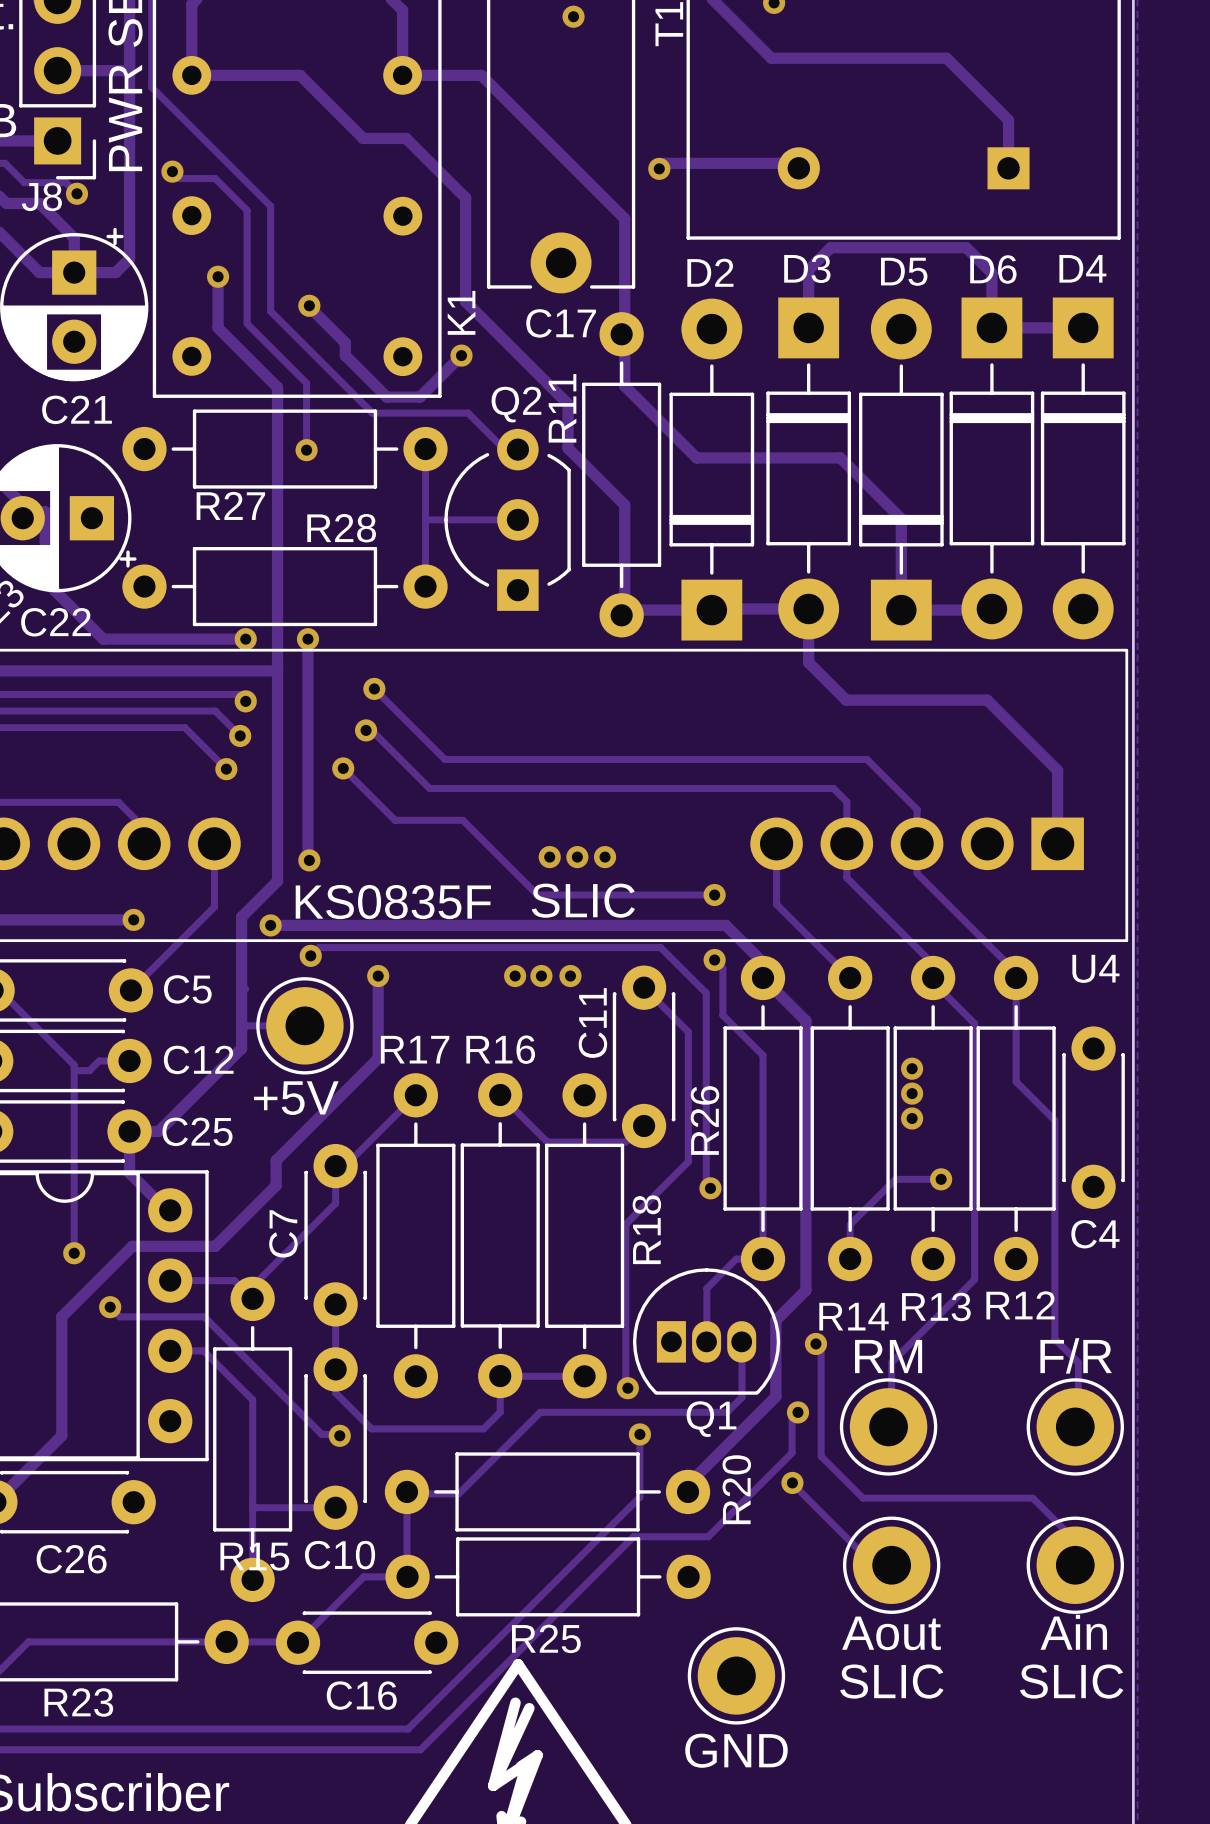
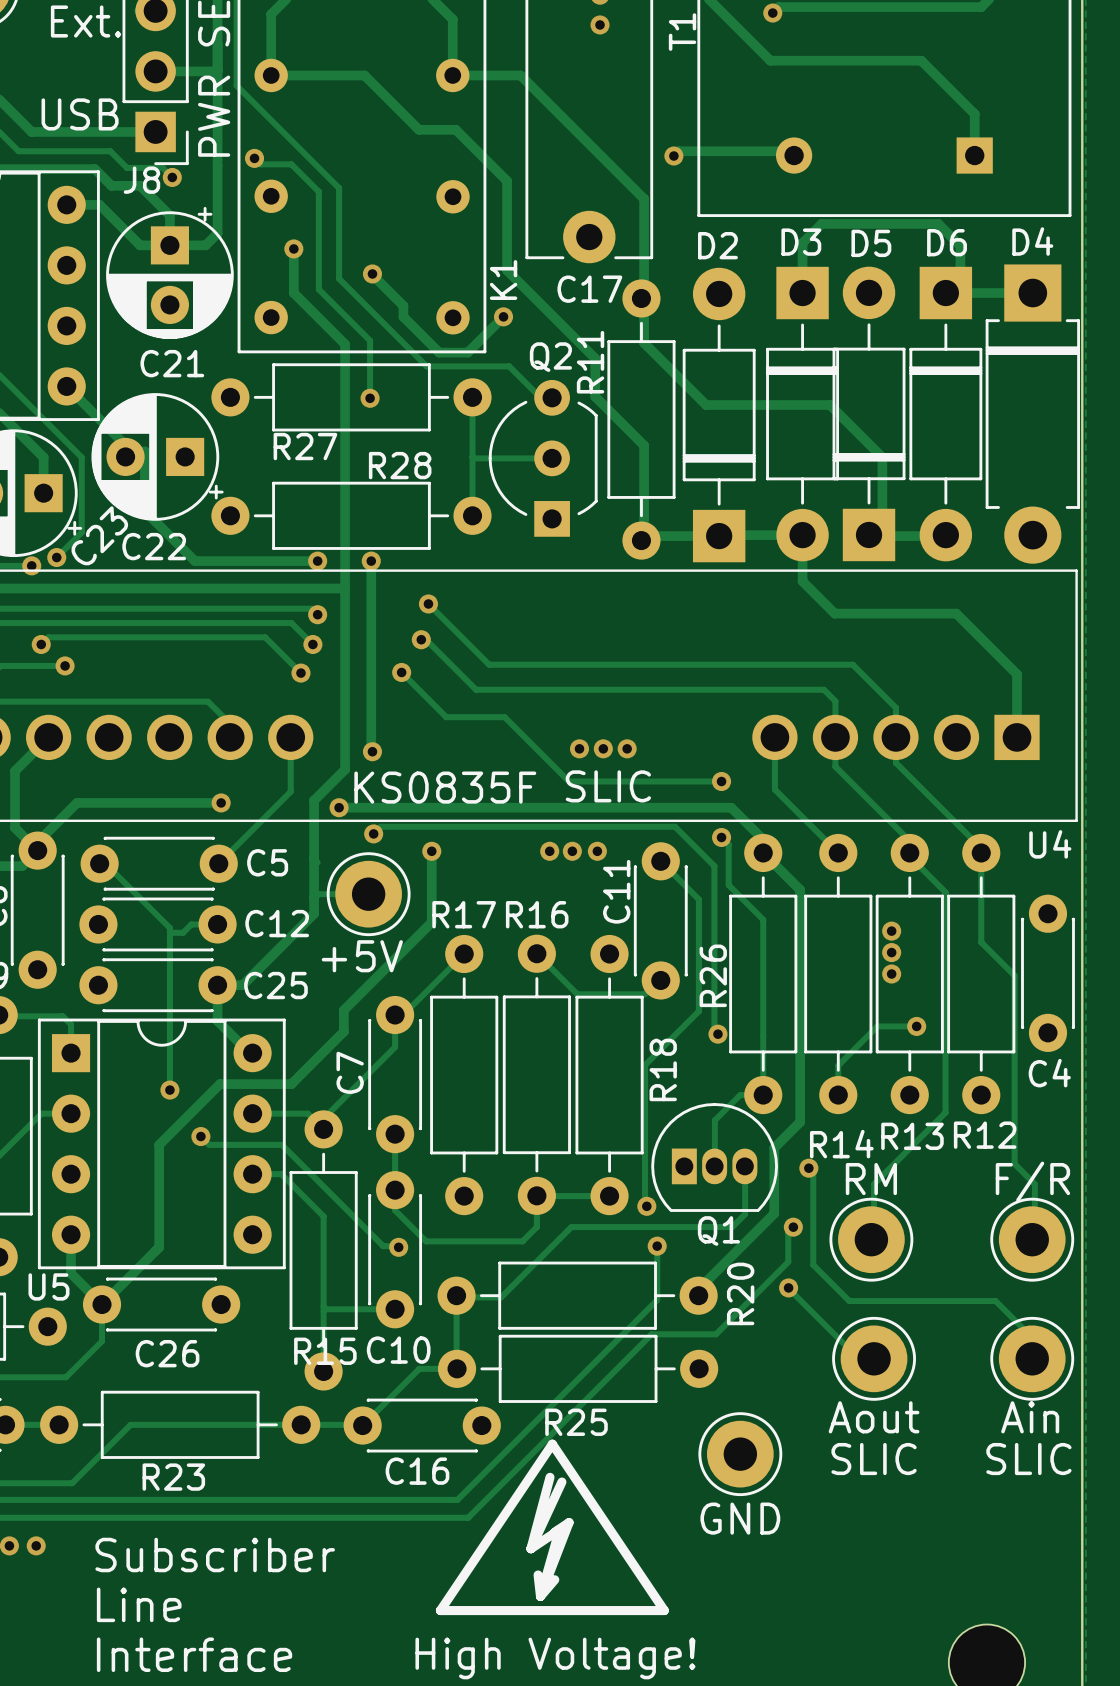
D4 footprint: [1040, 297, 1126, 640] -> [985, 264, 1081, 564]
D6 position: (991, 468) -> (945, 414)
D5 position: (901, 469) -> (869, 413)

